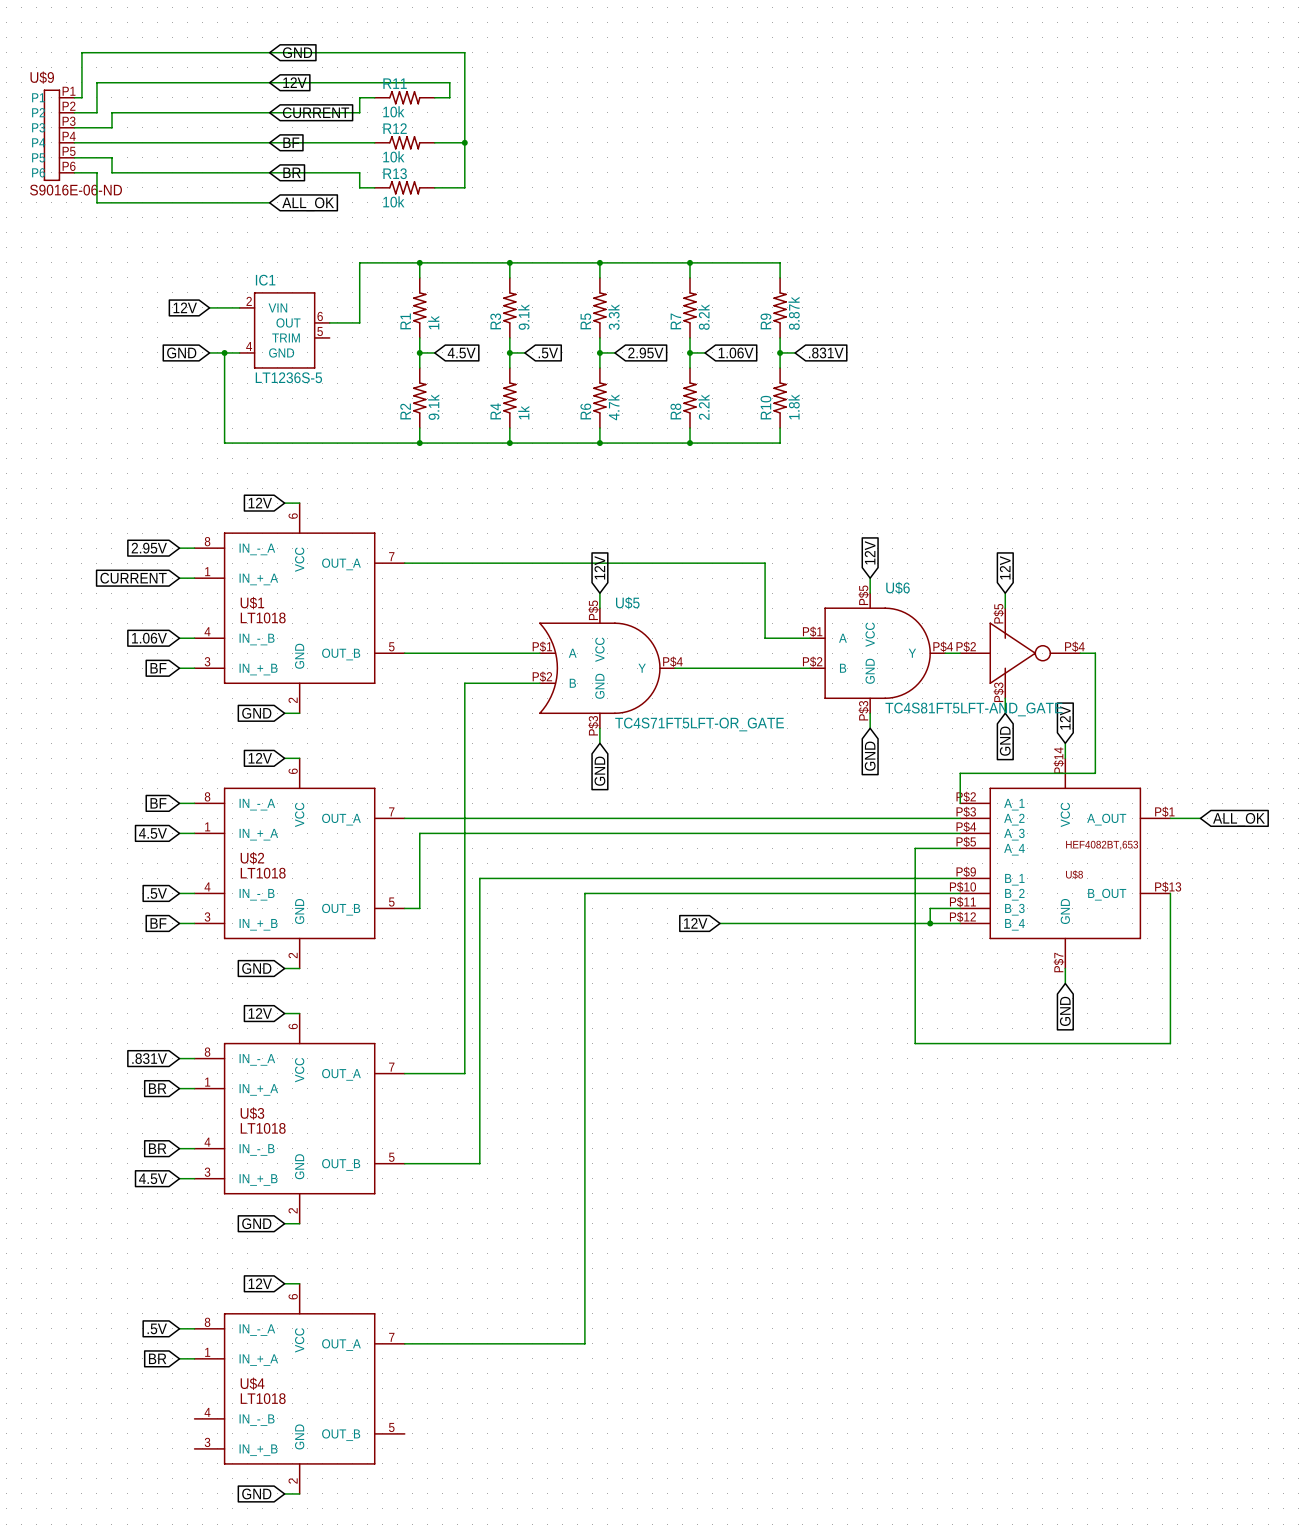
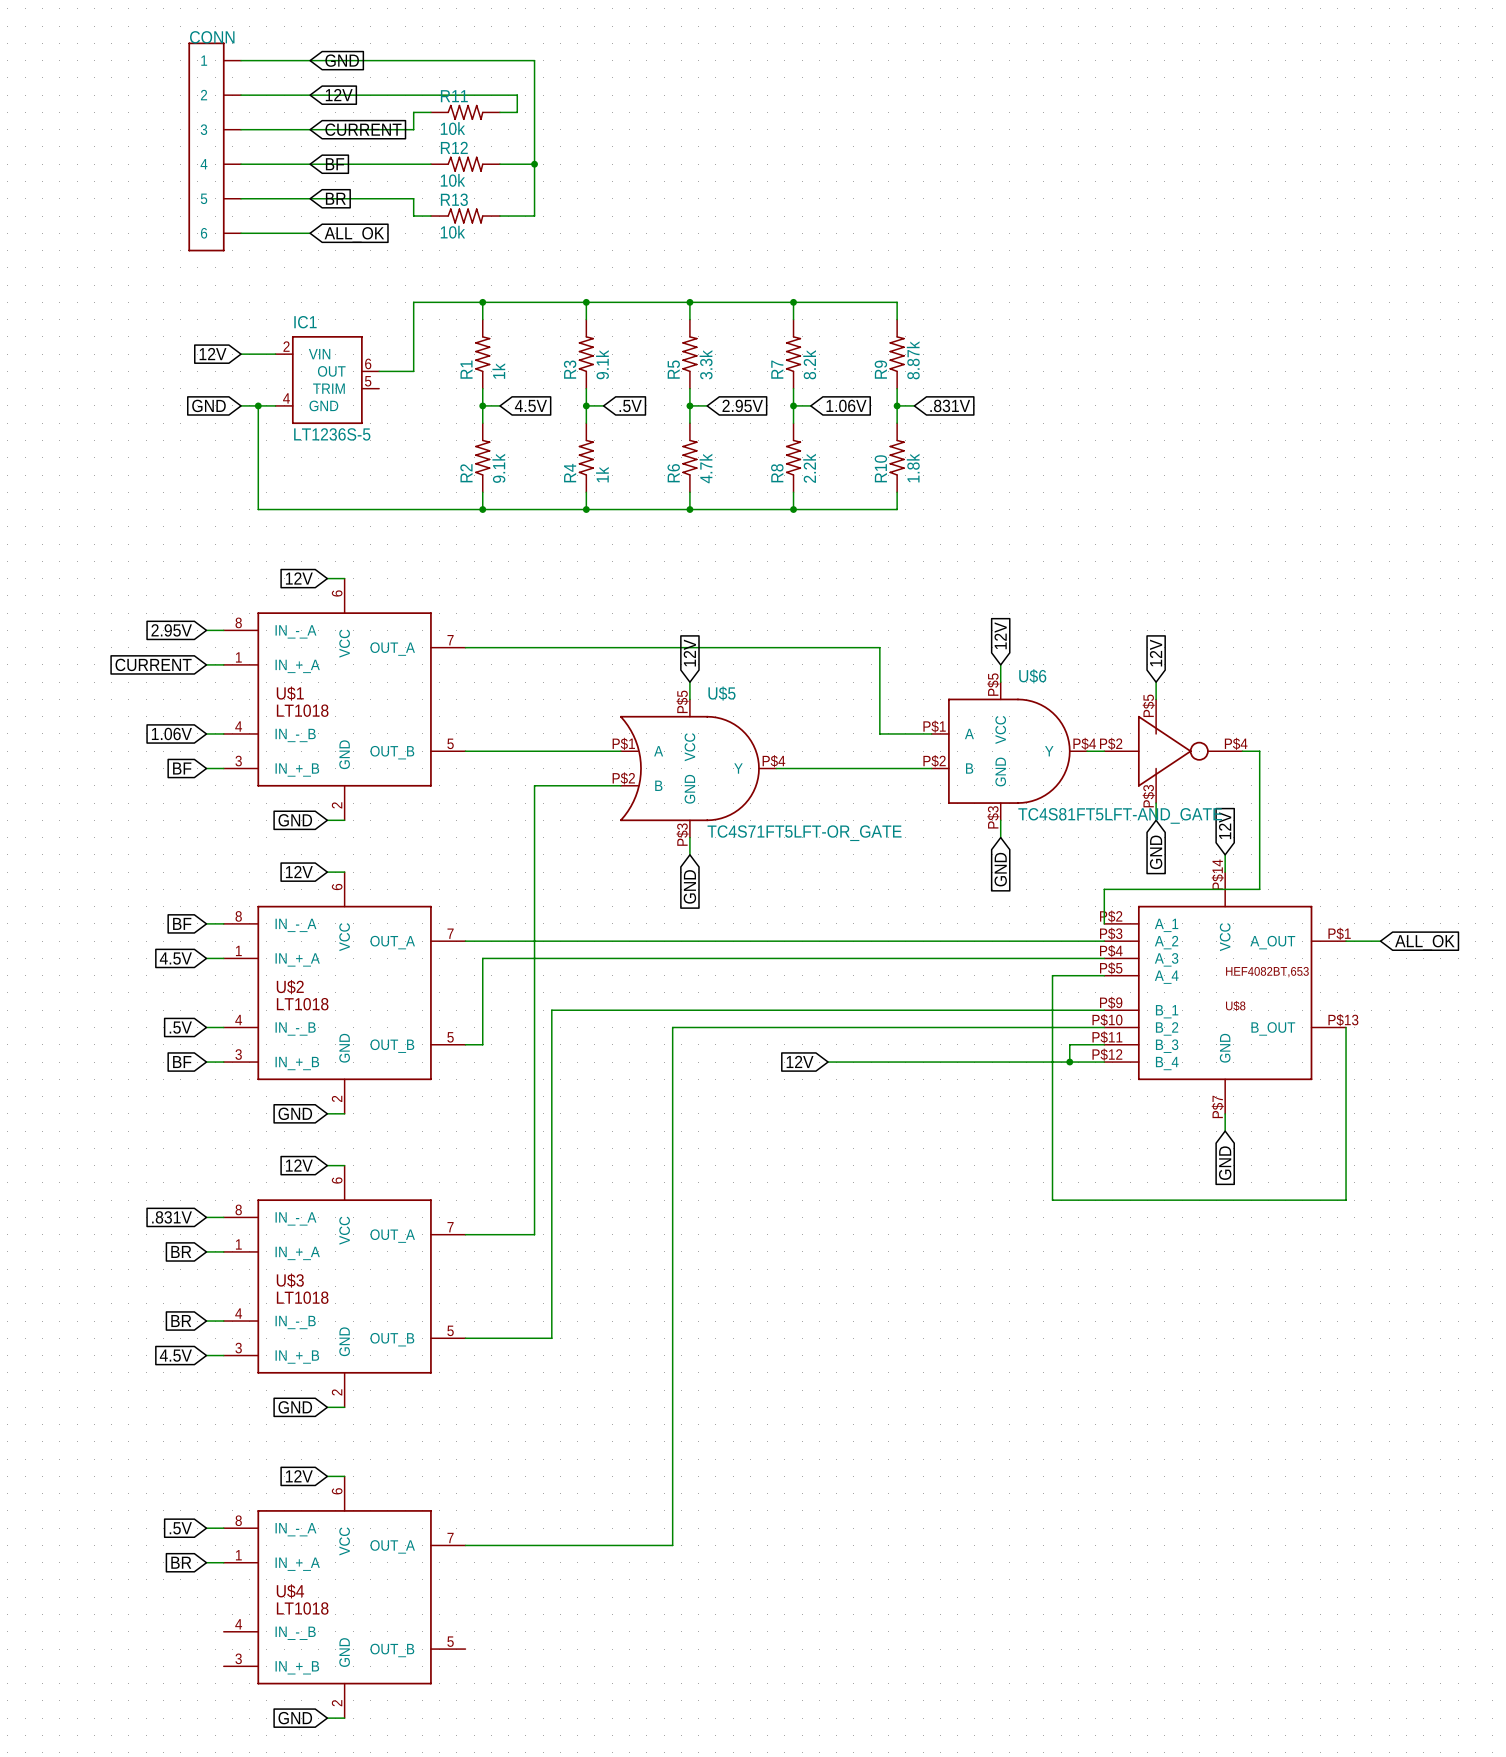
wire: (209, 52) (81, 52) (81, 97) (74, 97) -> none
wire: (209, 82) (96, 82) (96, 112) (74, 112) -> none
wire: (209, 112) (111, 112) (111, 127) (74, 127) -> none
CONN: none -> (214, 146)
U$9: S9016E-06-ND (59, 135) -> none
wire: (74, 142) (209, 142) -> none
wire: (74, 157) (111, 157) (111, 172) (209, 172) -> none
wire: (74, 172) (96, 172) (96, 202) (209, 202) -> none

